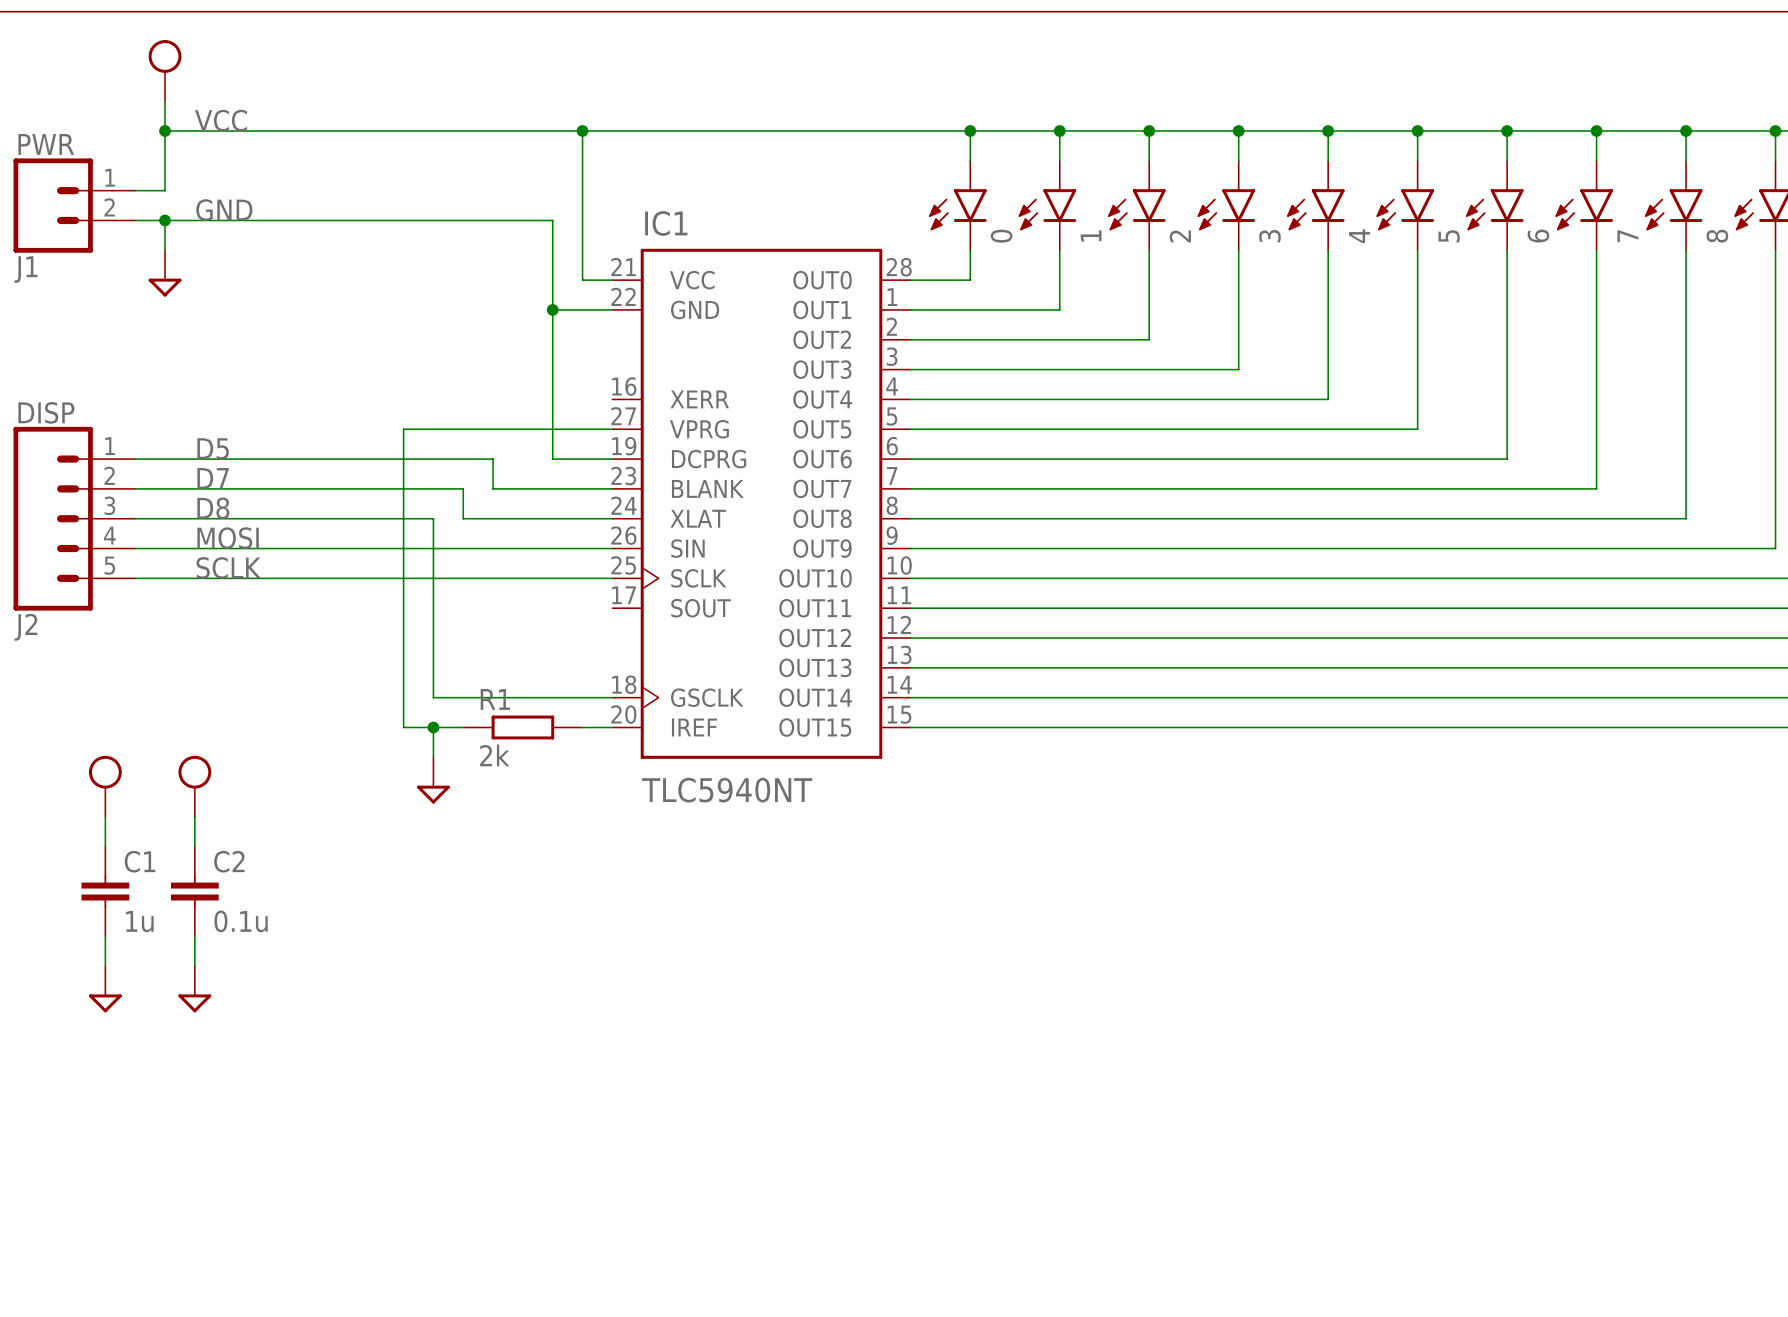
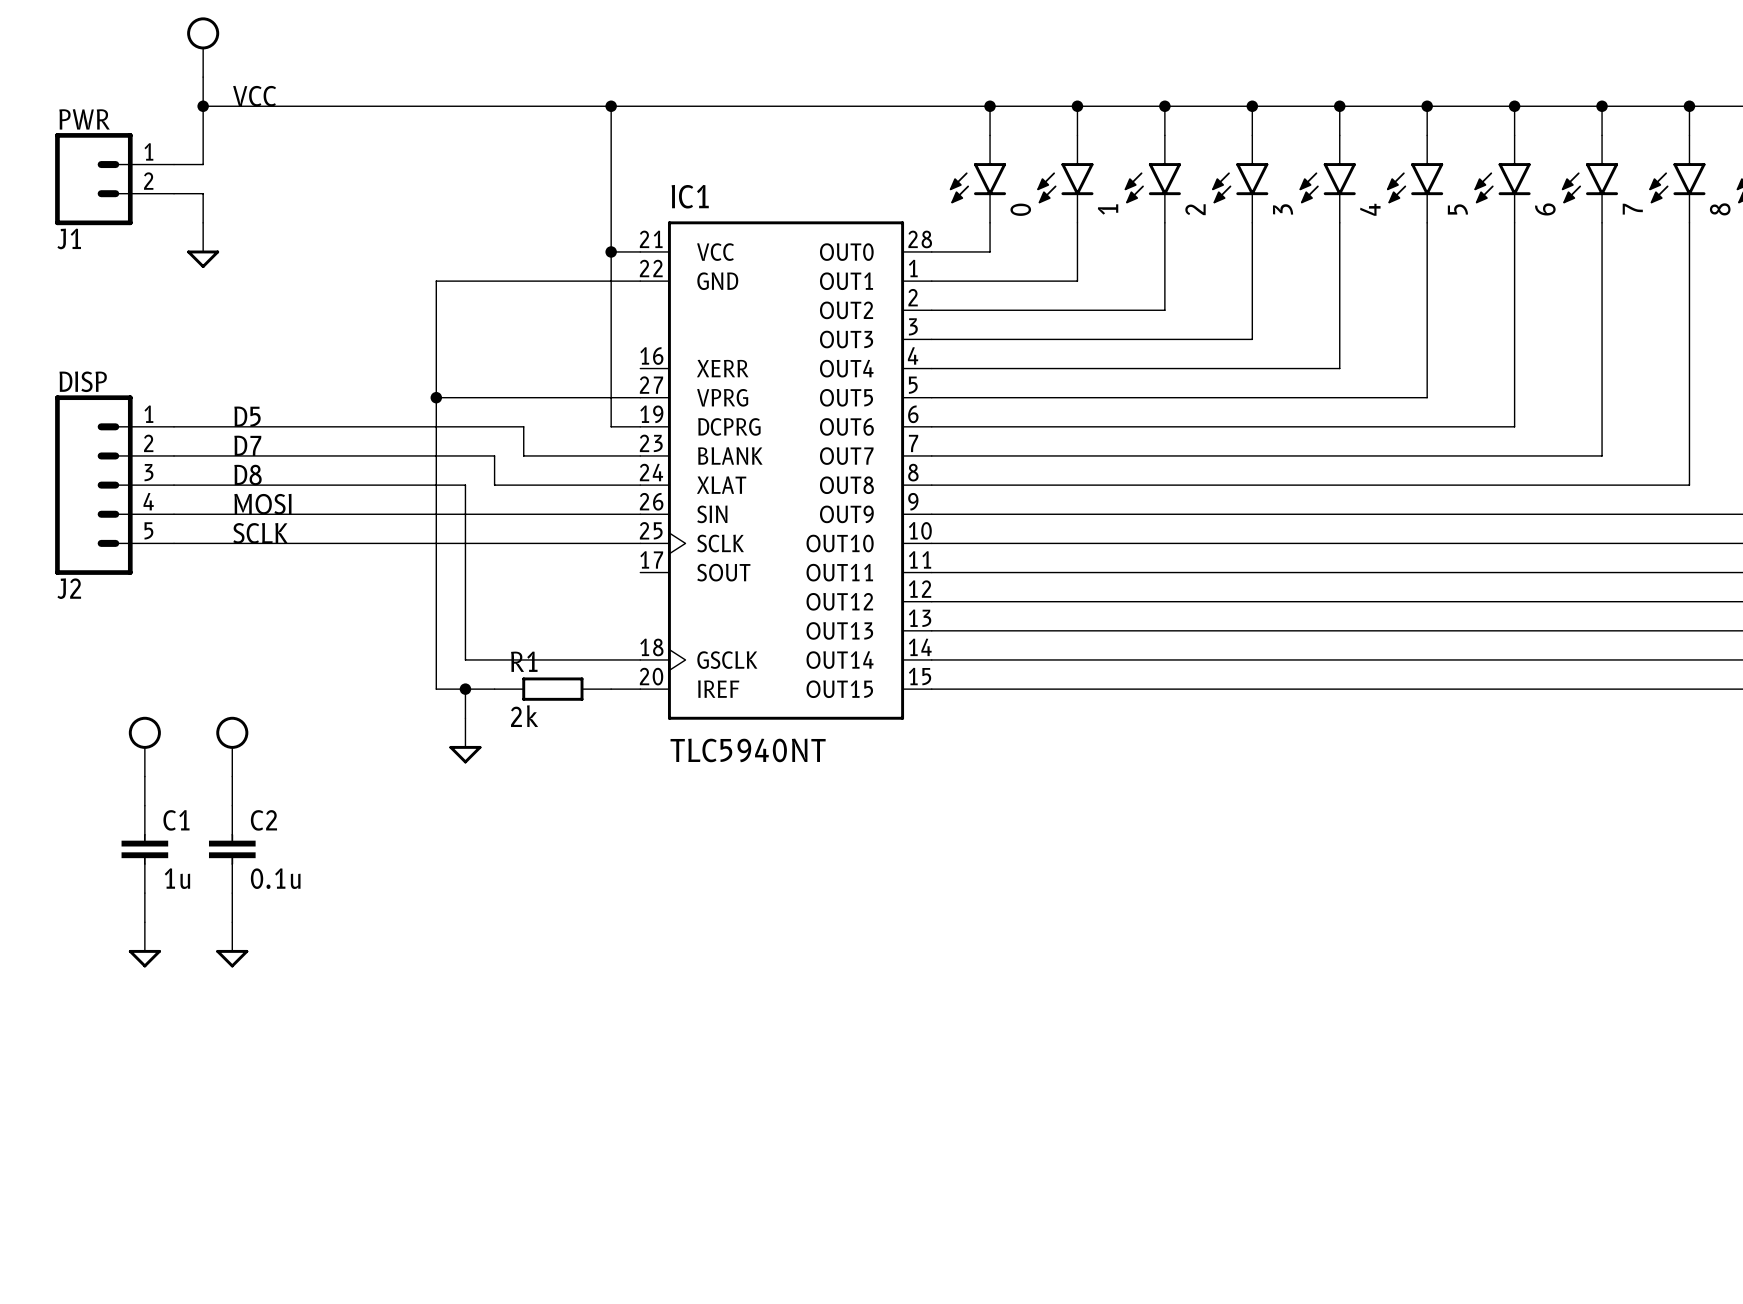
label: GND (224, 210) -> none
wire: (165, 220) (552, 220) (552, 459) (582, 459) -> (611, 251) (611, 426)
junction: (165, 220) -> none
wire: none -> (582, 281) (436, 281) (436, 397)
junction position: (552, 309) -> (611, 251)
junction: none -> (436, 397)

